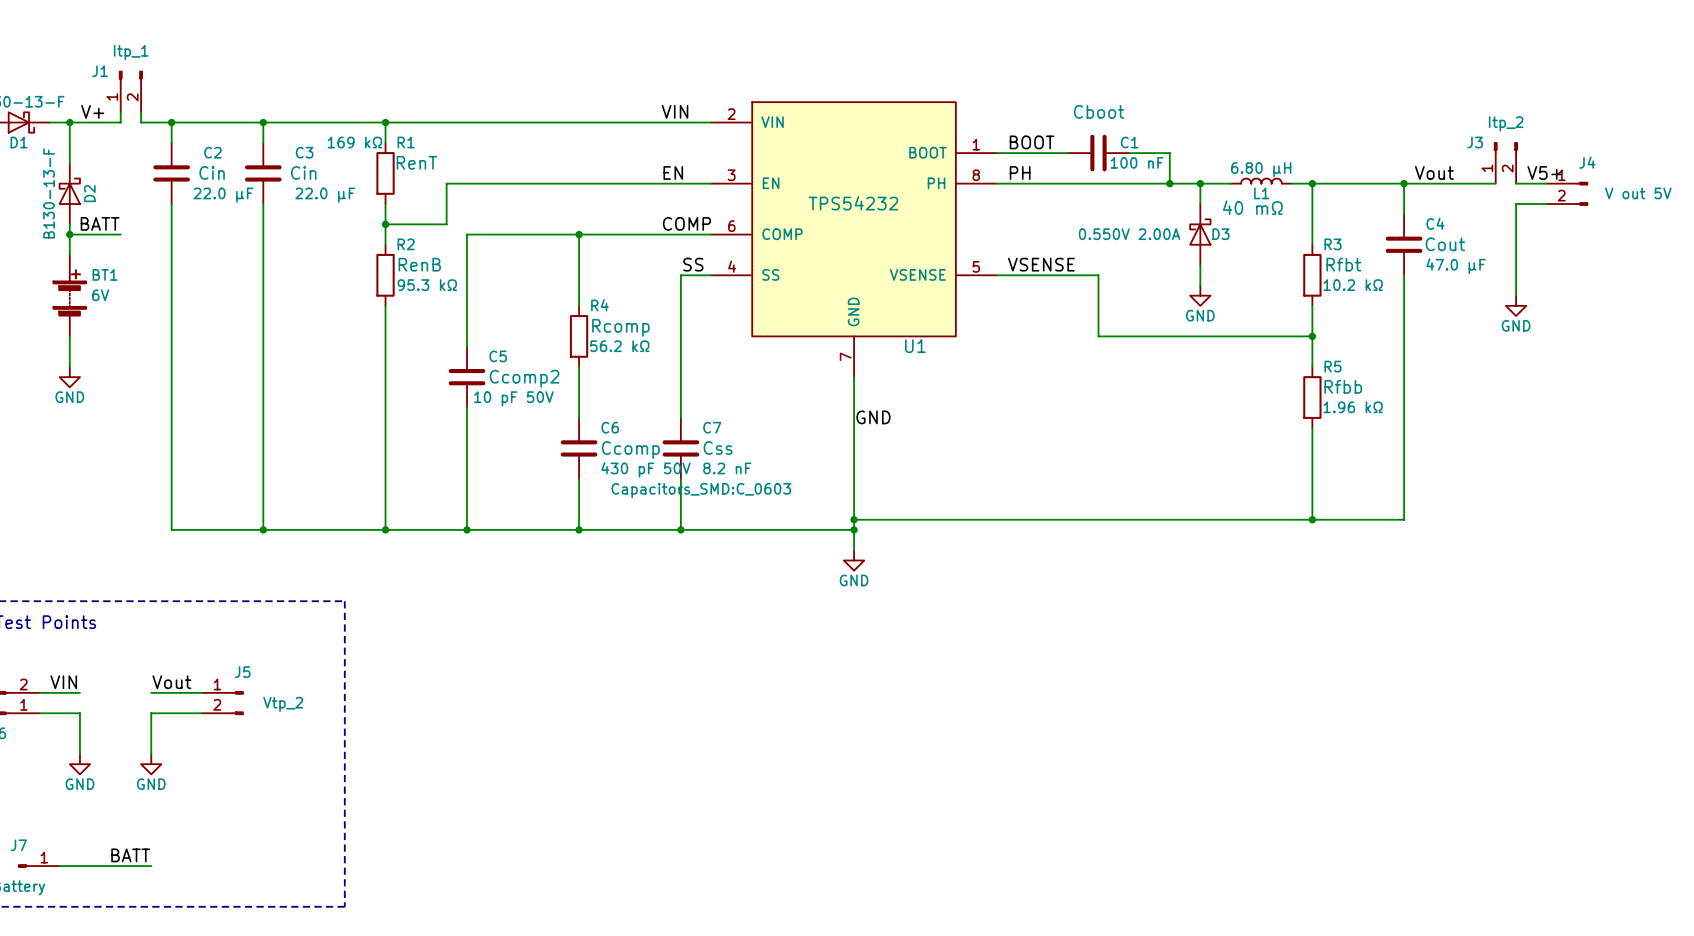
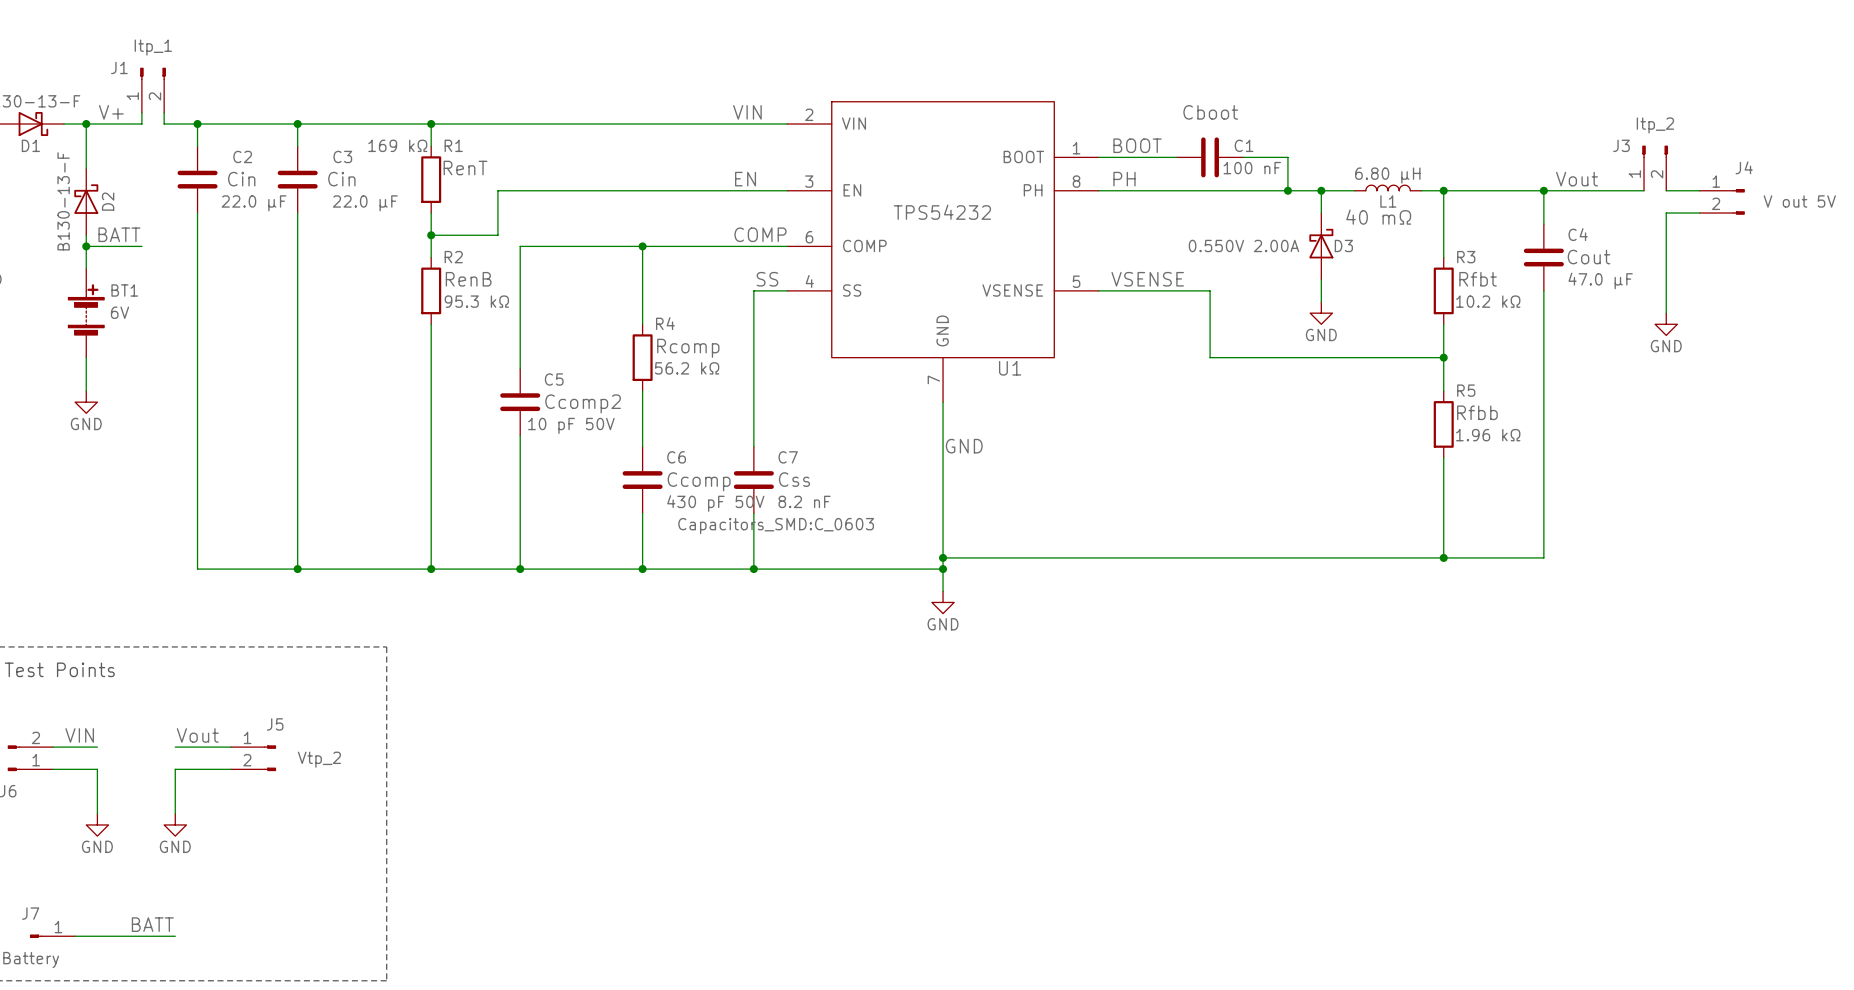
label: V5+ (1544, 172) -> none

